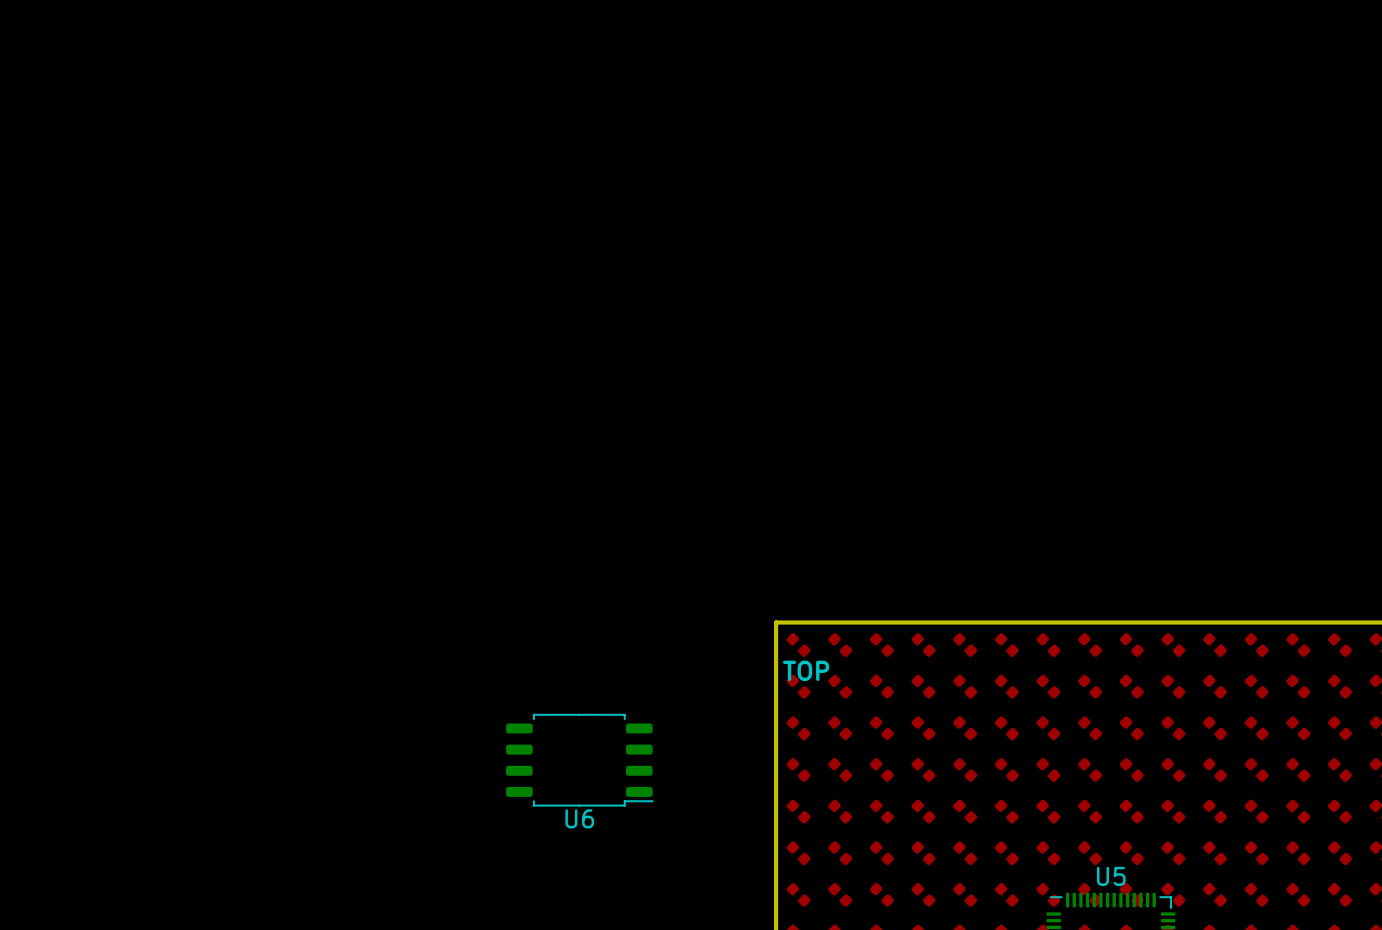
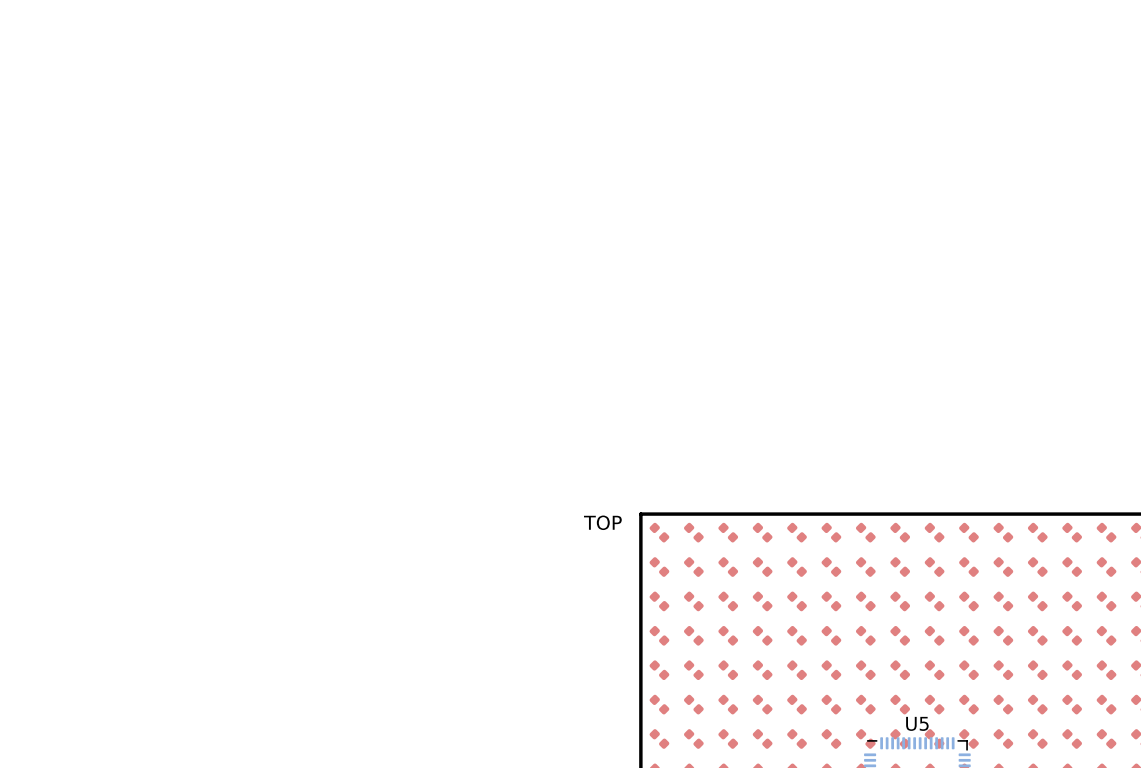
text position: TOP (806, 670) -> TOP (602, 522)
U6: (579, 760) -> none

